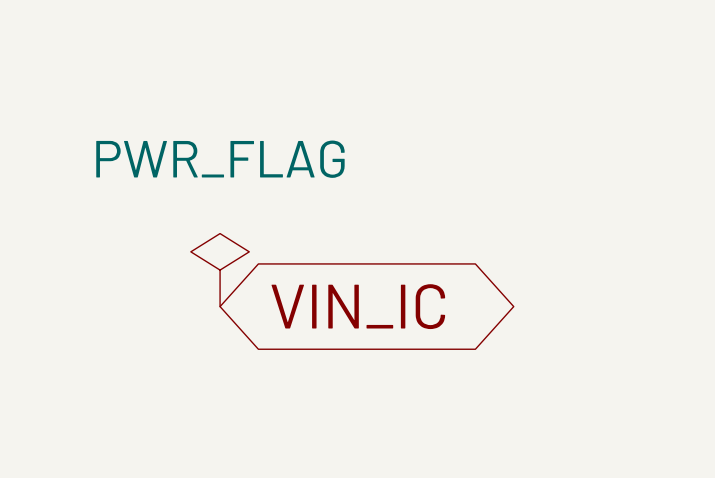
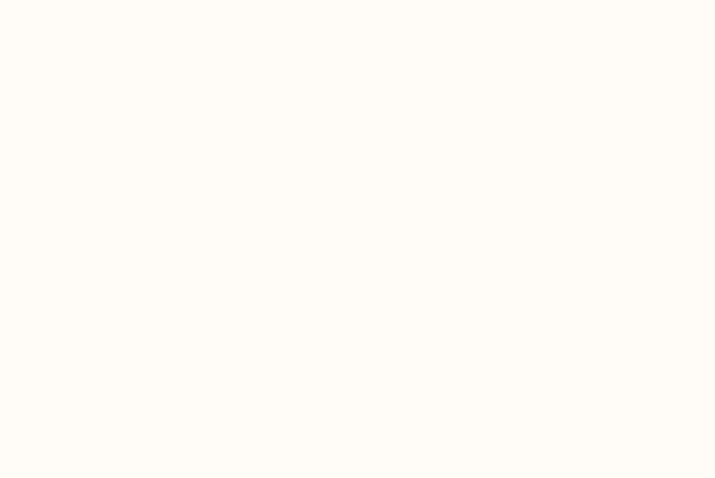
power symbol: PWR_FLAG (220, 270) -> none
global label: VIN_IC (358, 306) -> none

